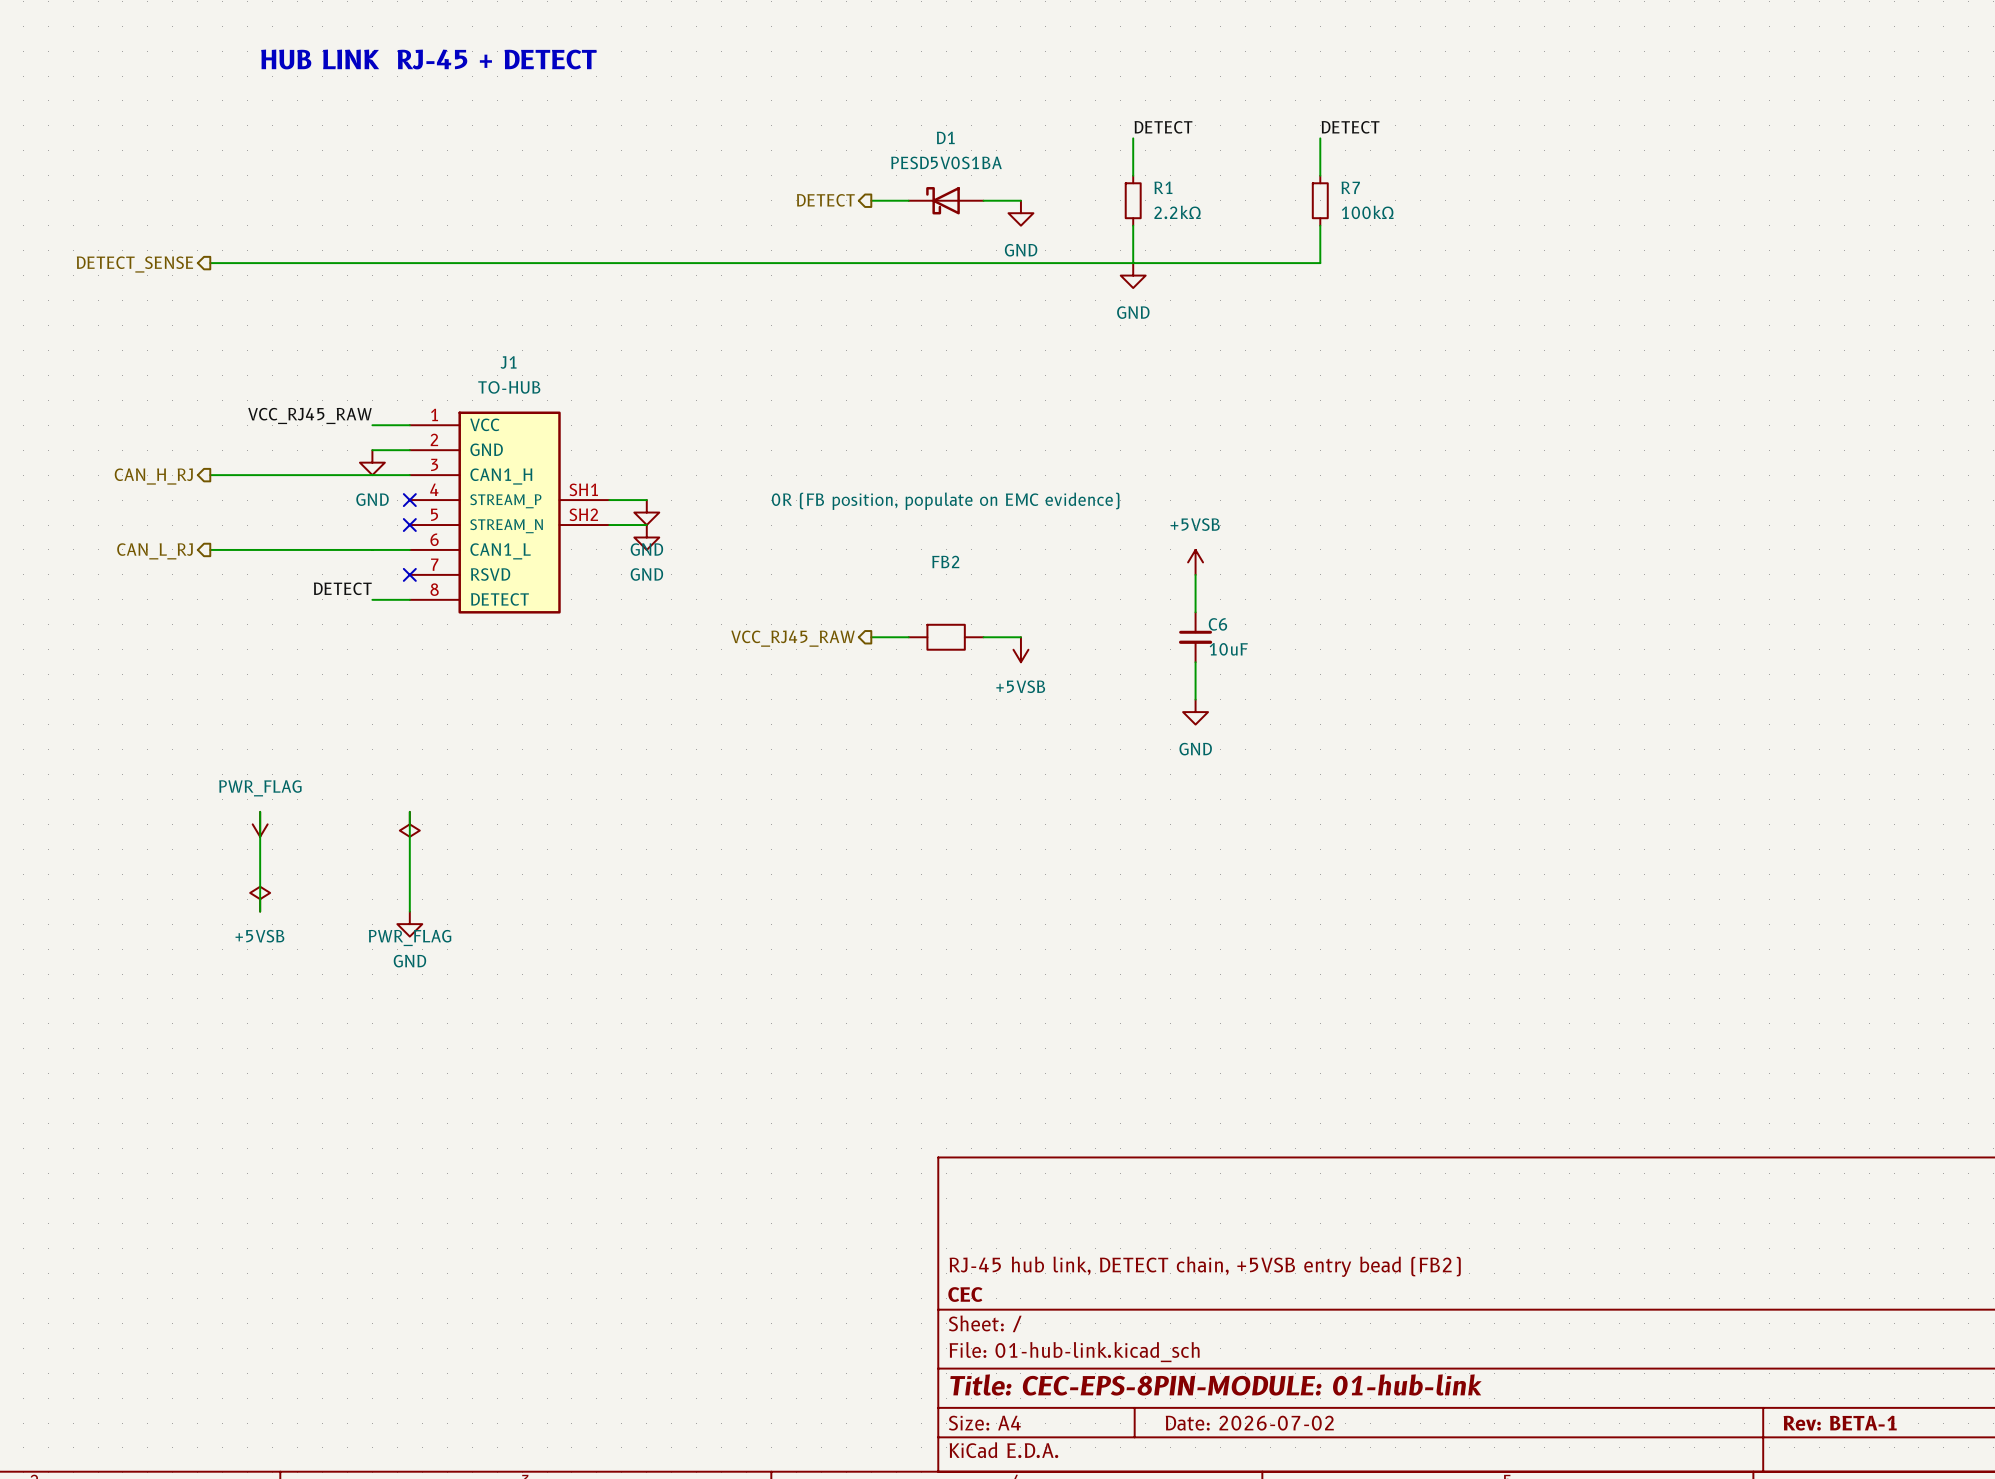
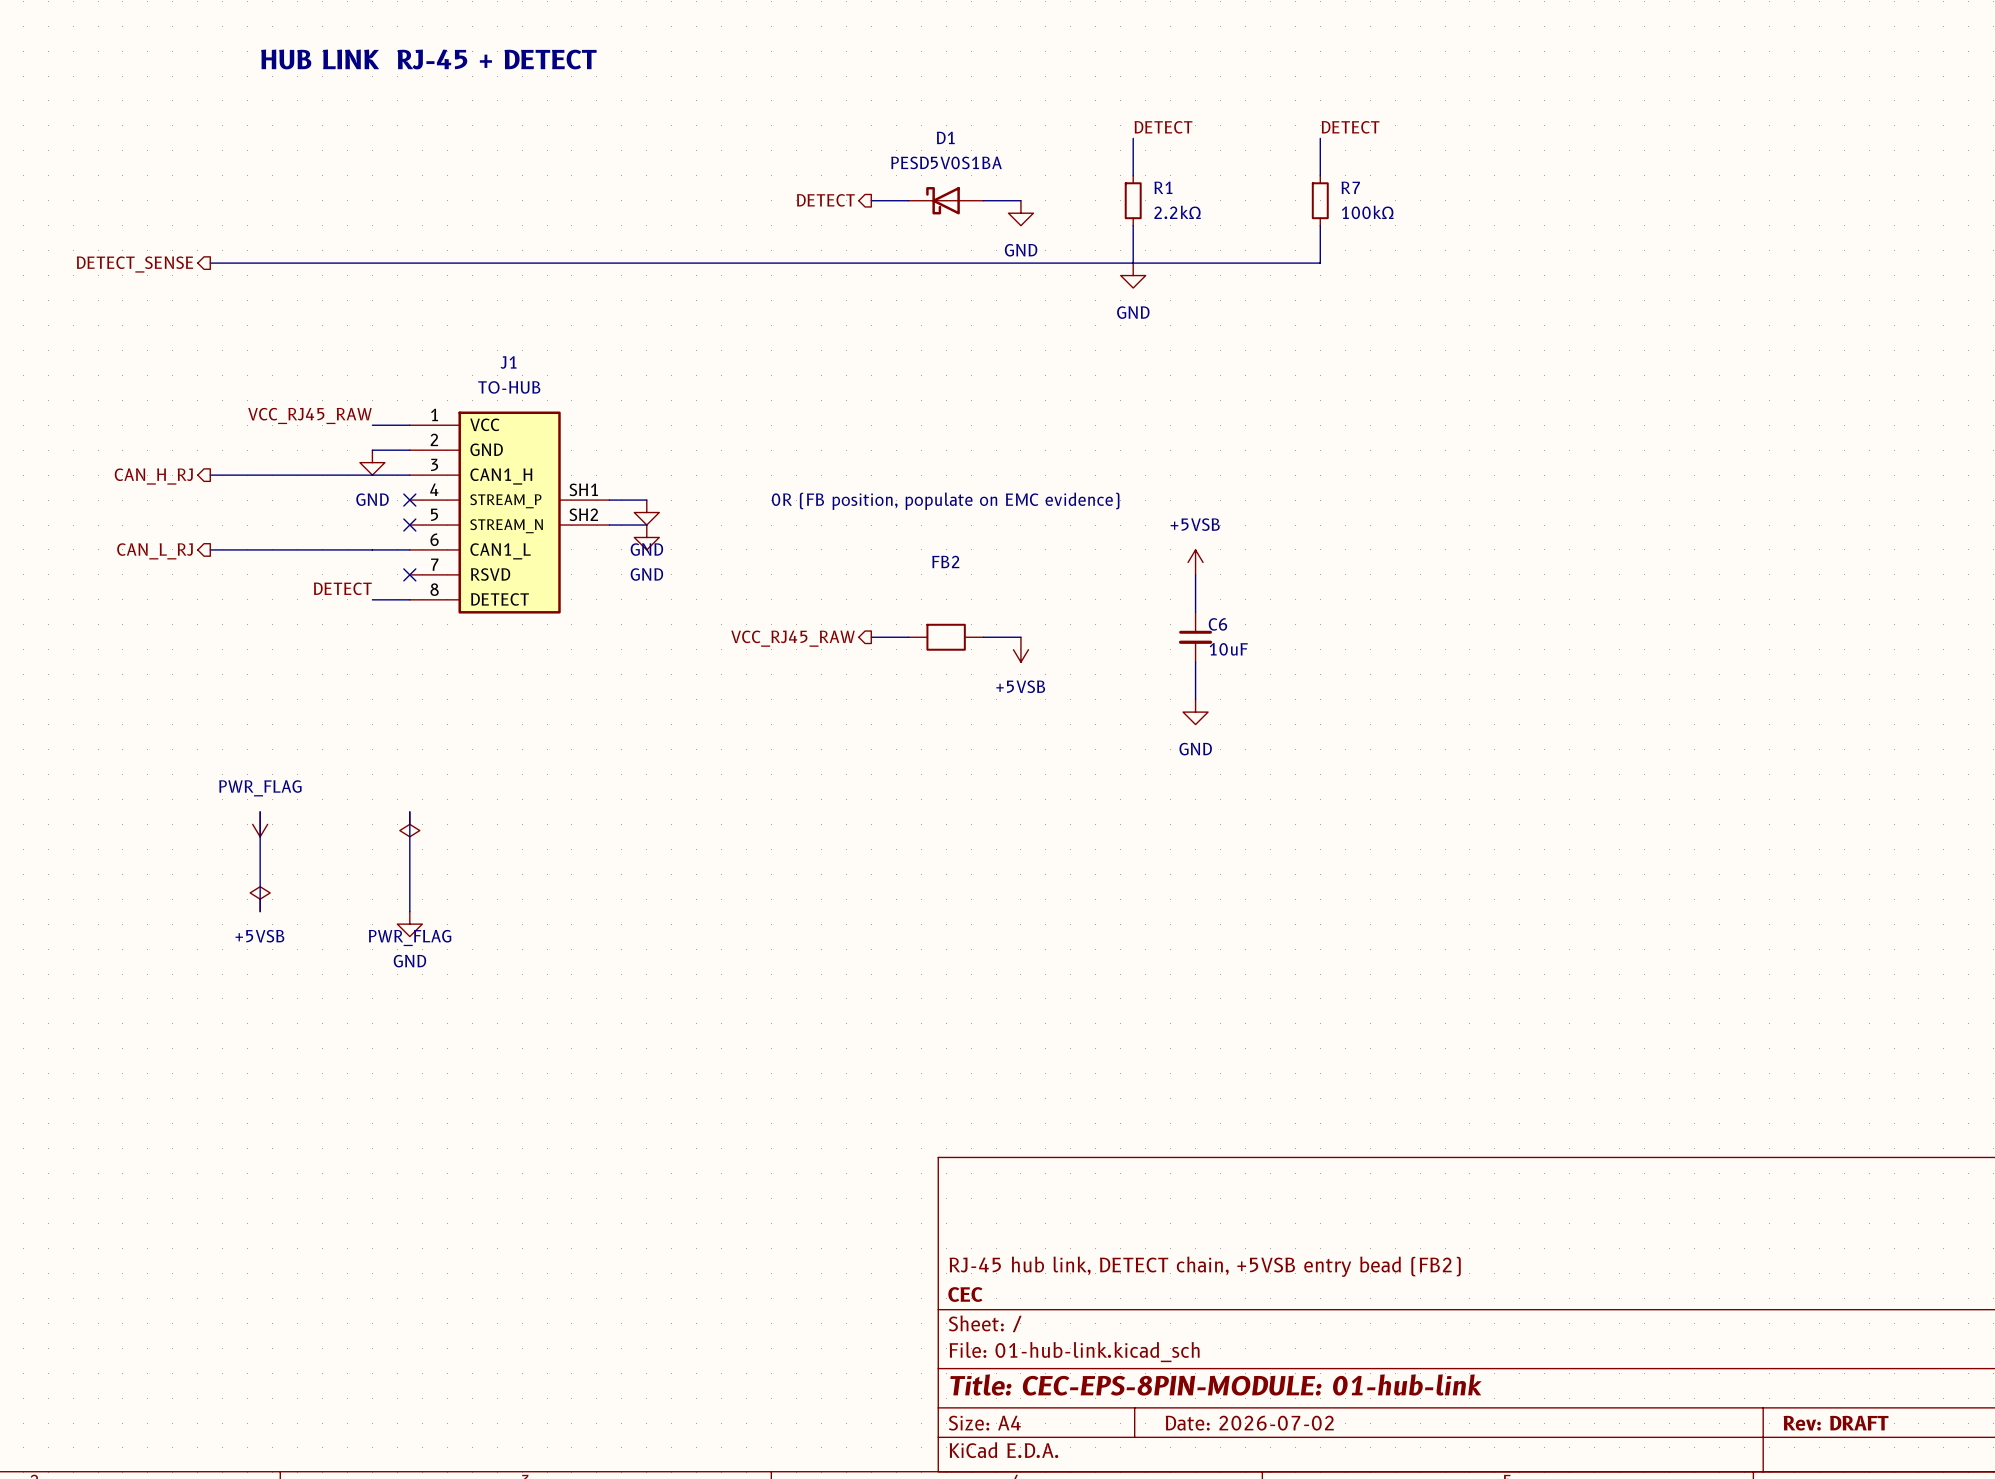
title block: Rev: BETA-1 (1840, 1423) -> Rev: DRAFT (1836, 1423)

